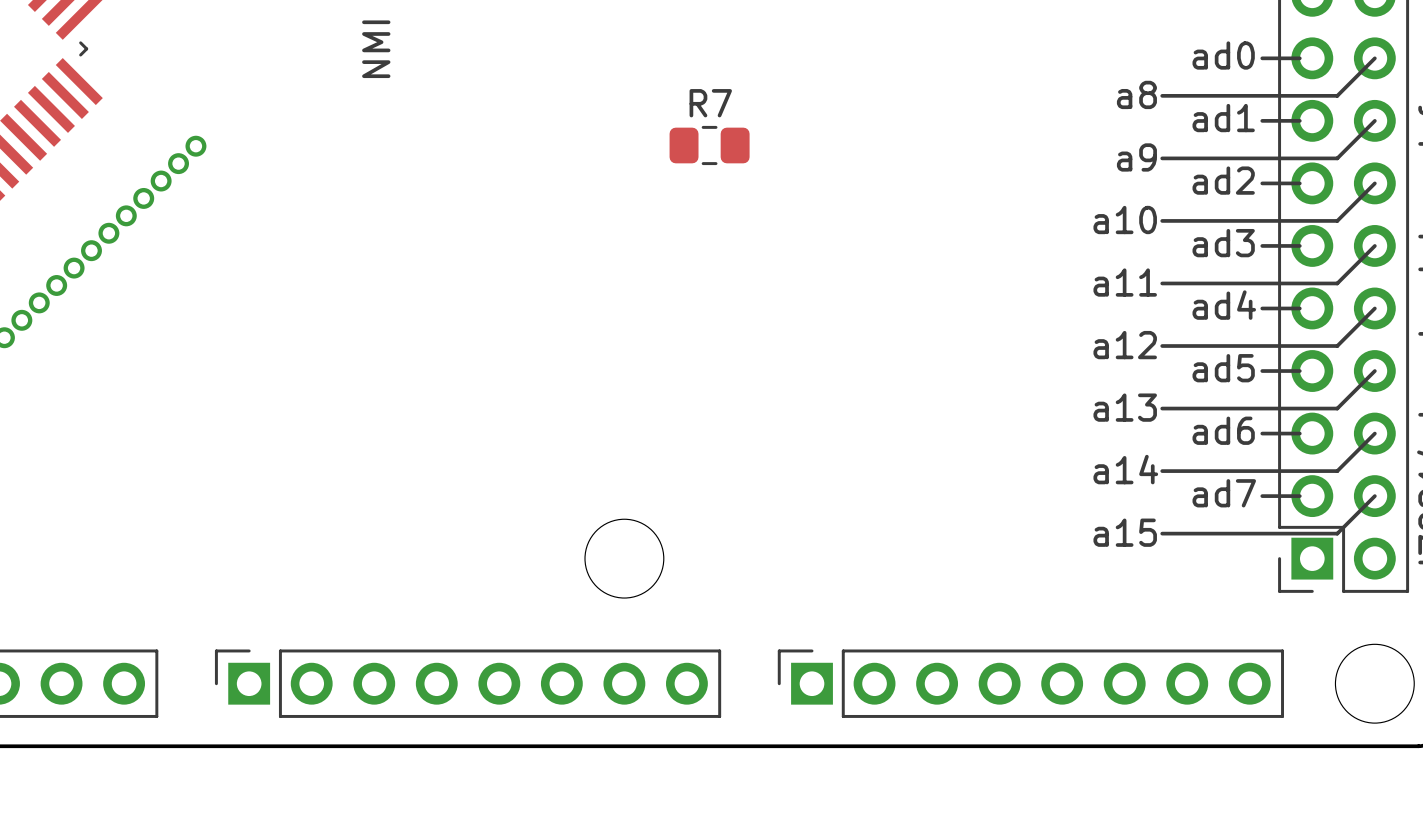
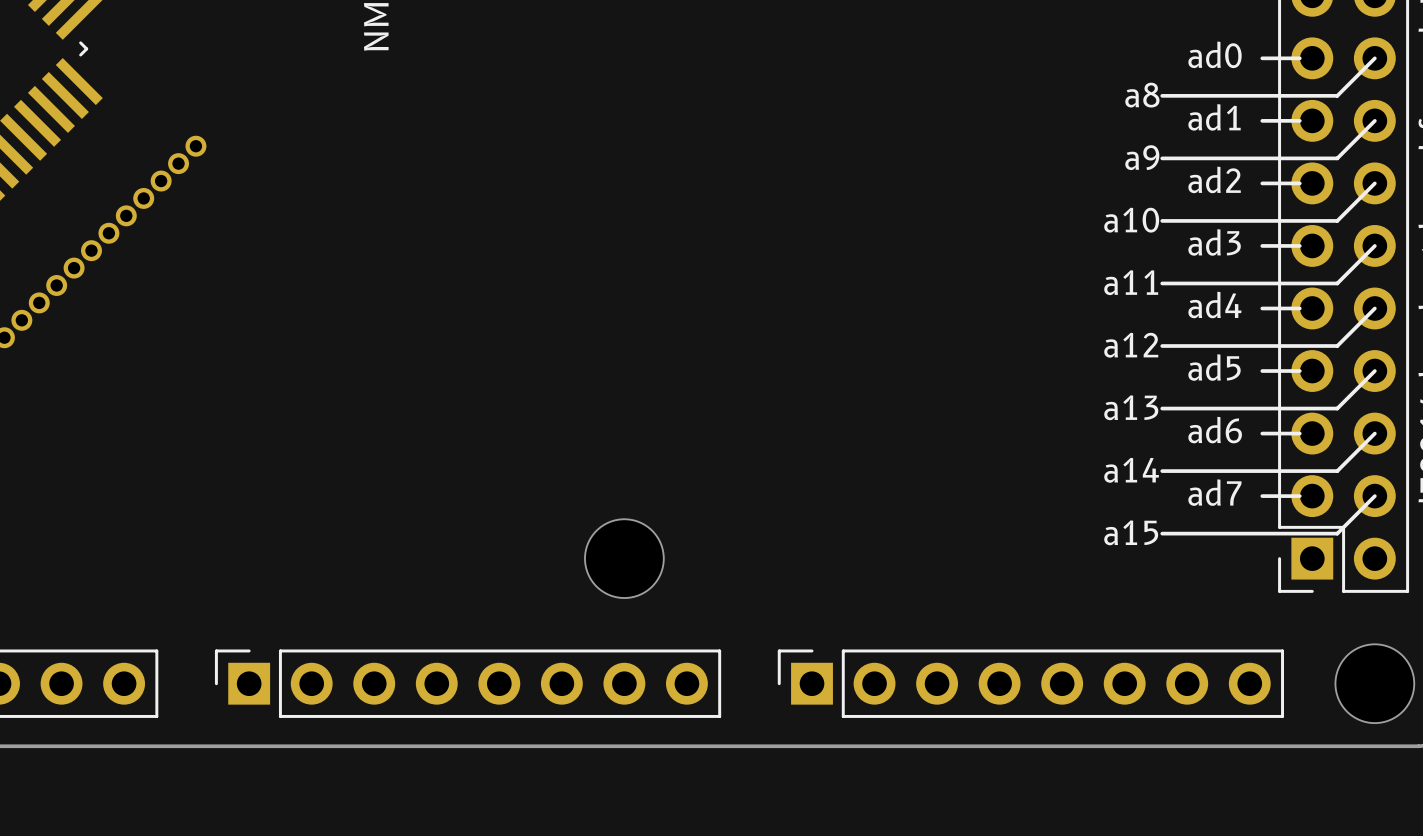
R7: (709, 145) -> none

